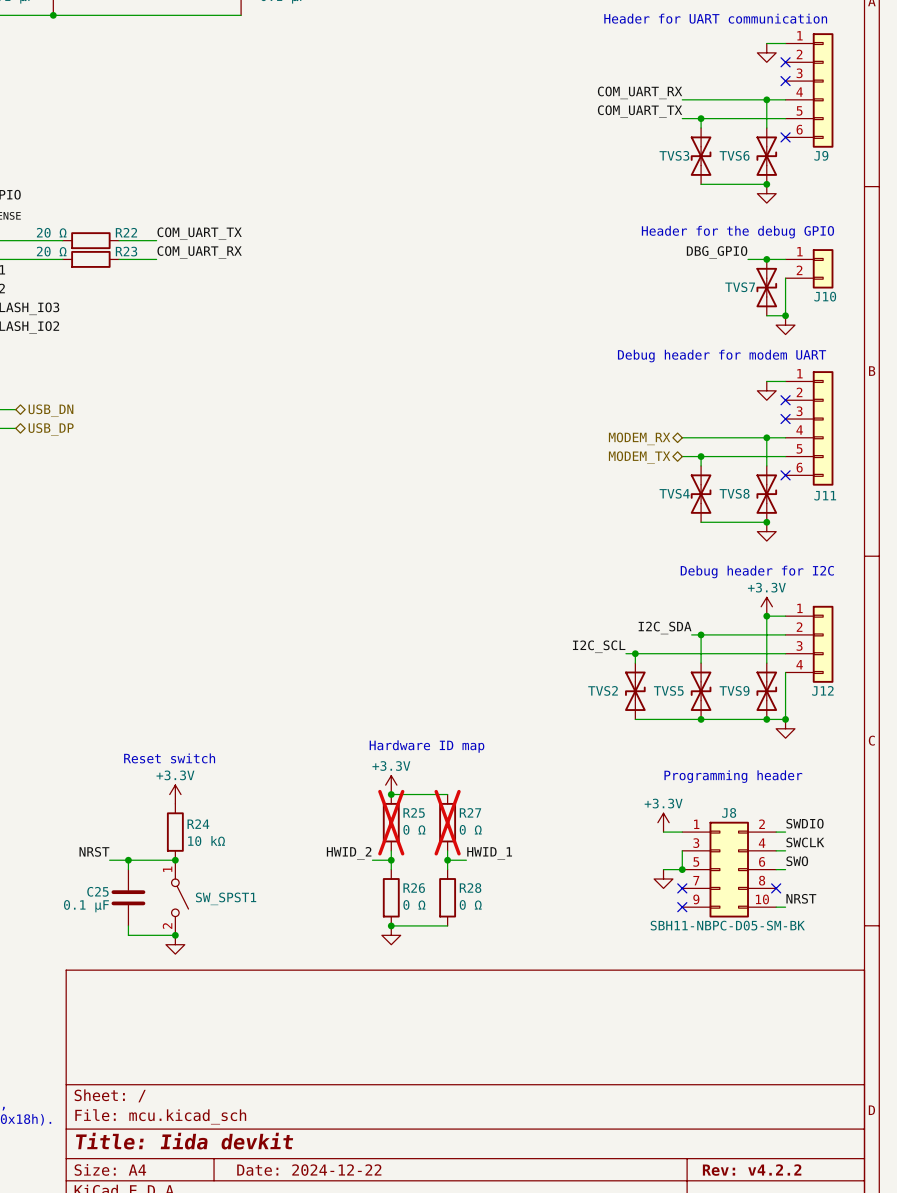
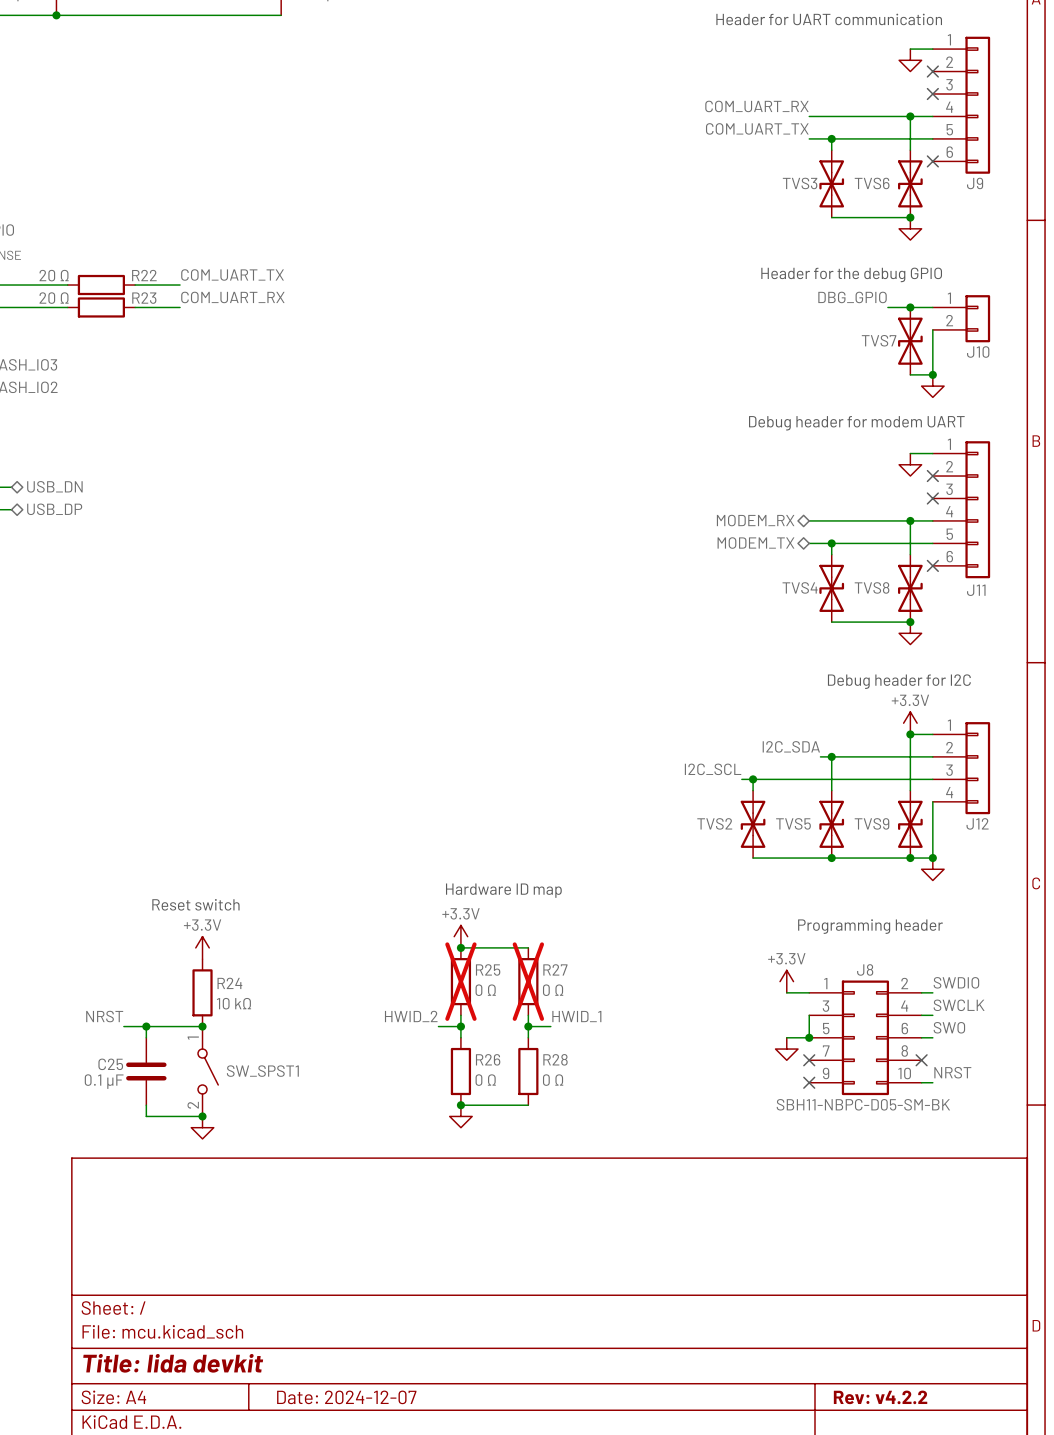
title block: Date: 2024-12-22 (309, 1170) -> Date: 2024-12-07 (346, 1397)

